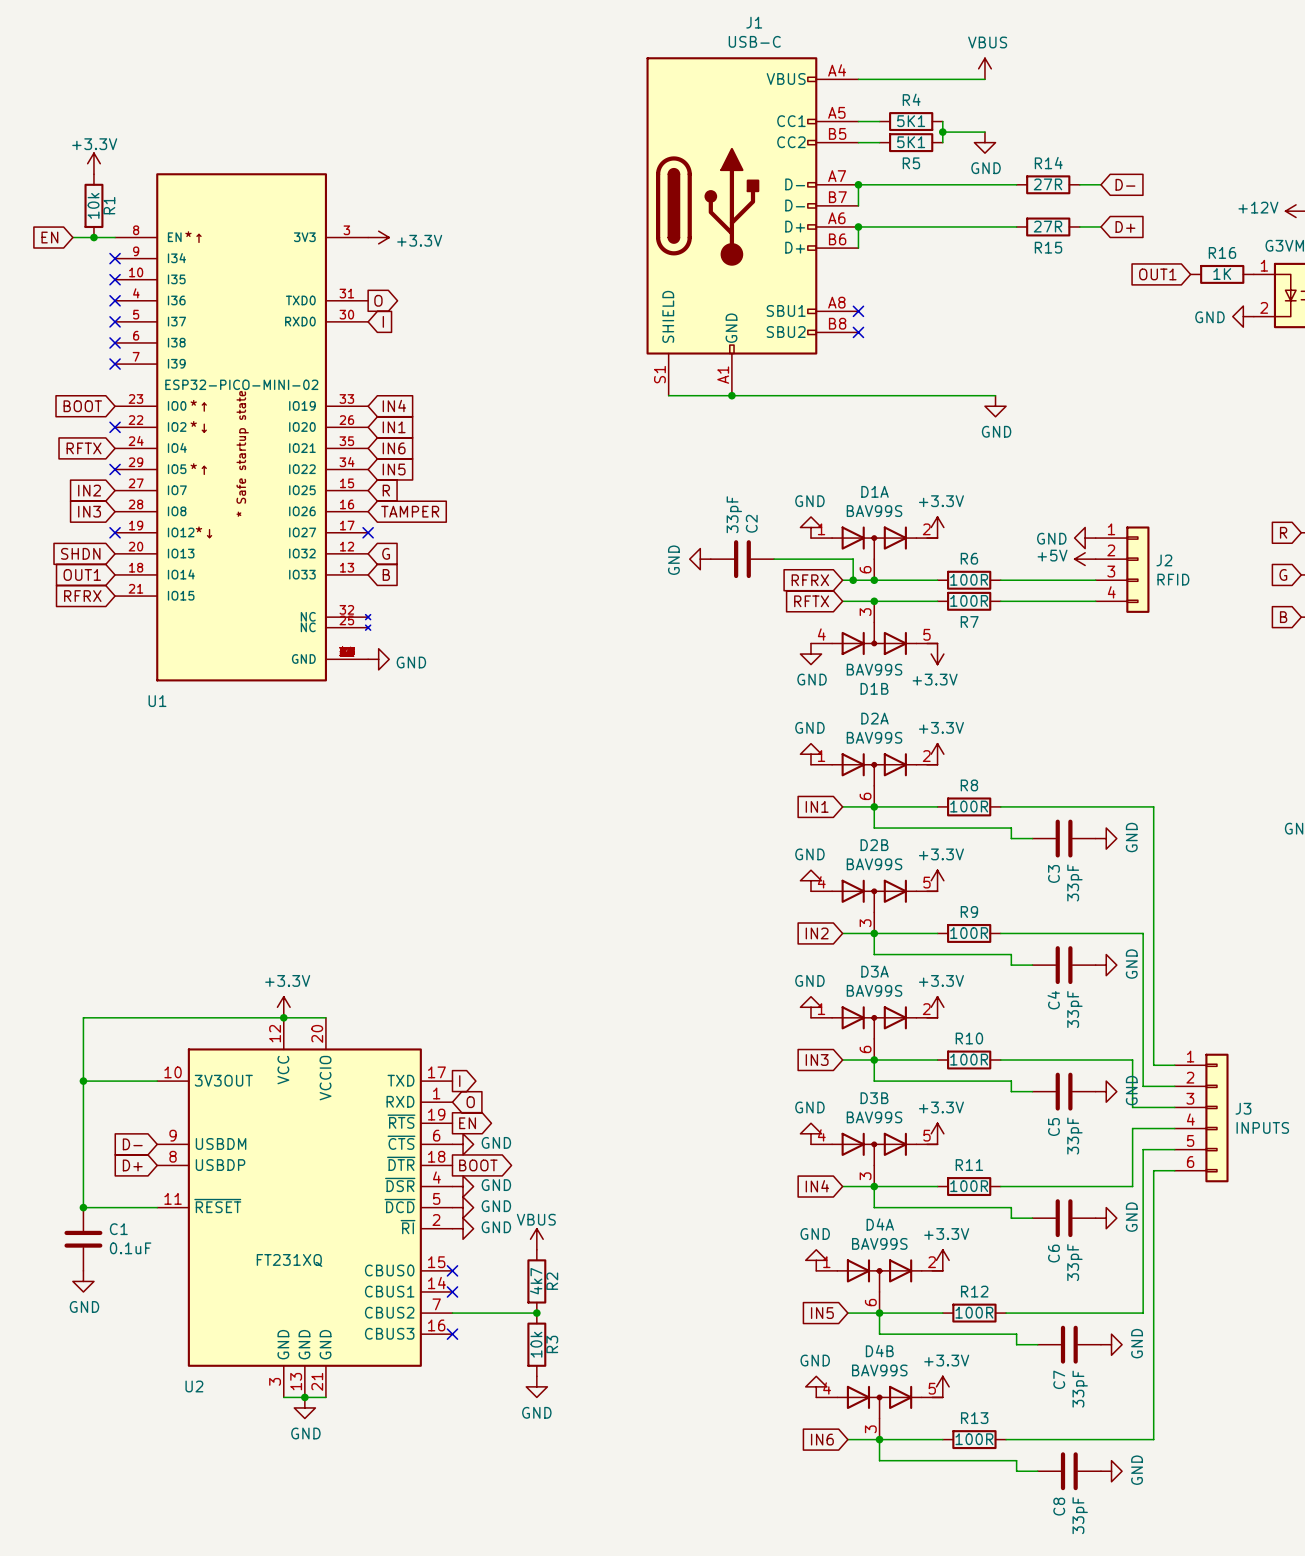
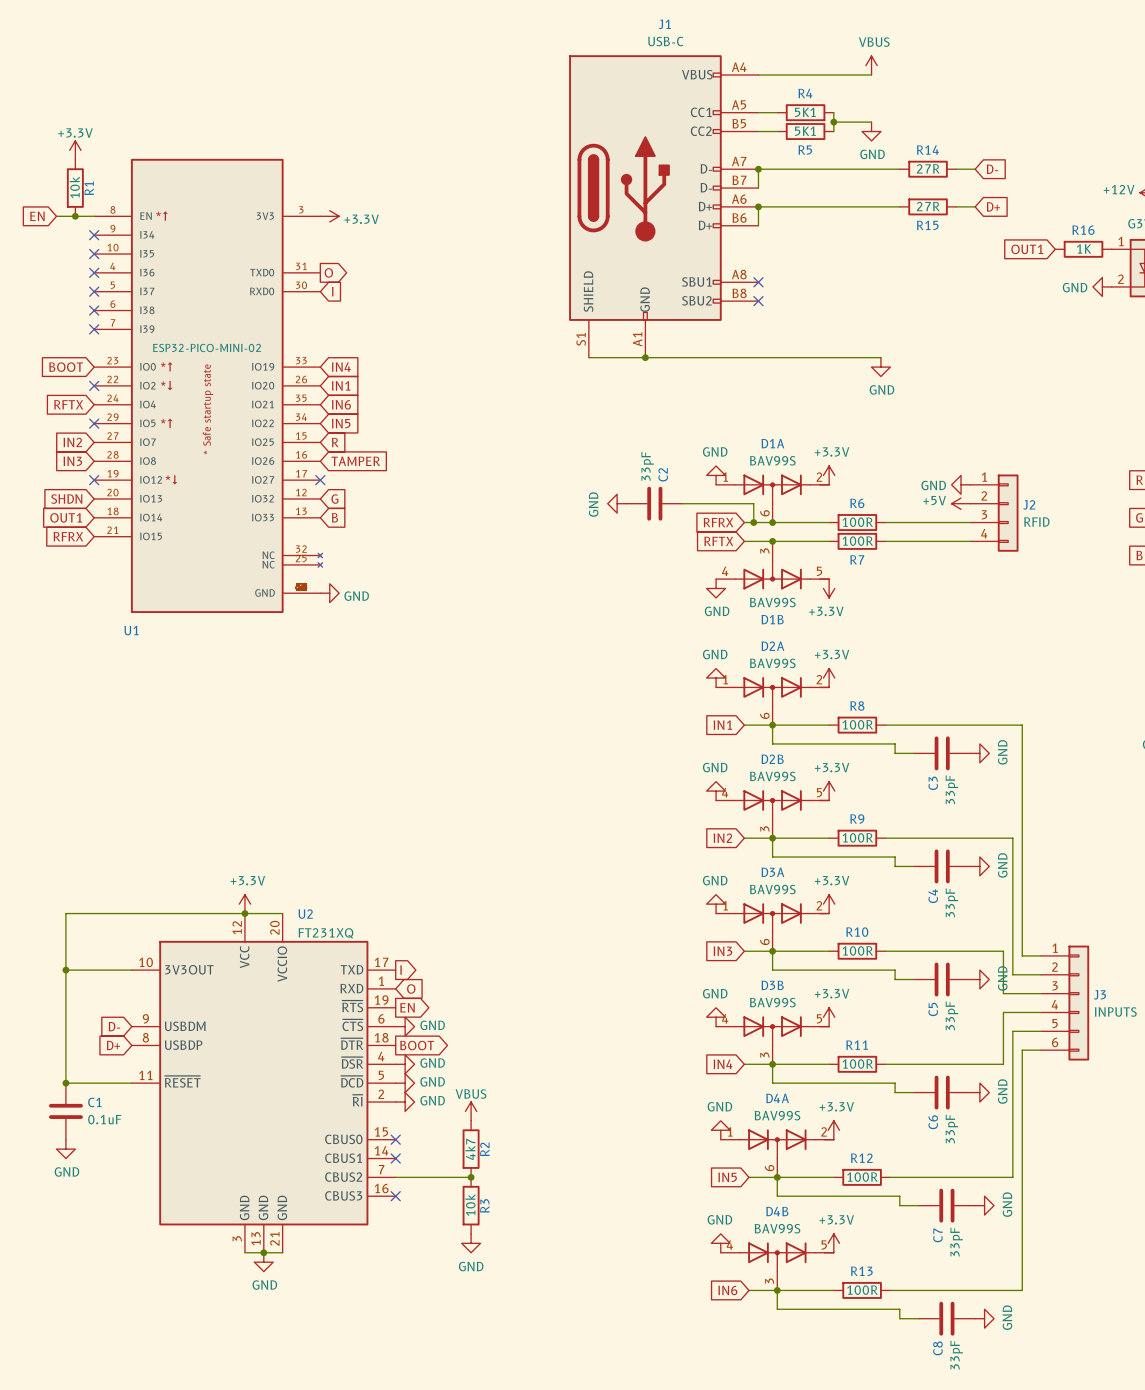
U2 value position: FT231XQ (289, 1260) -> FT231XQ (325, 933)
U2 name position: U2 (194, 1386) -> U2 (305, 914)

